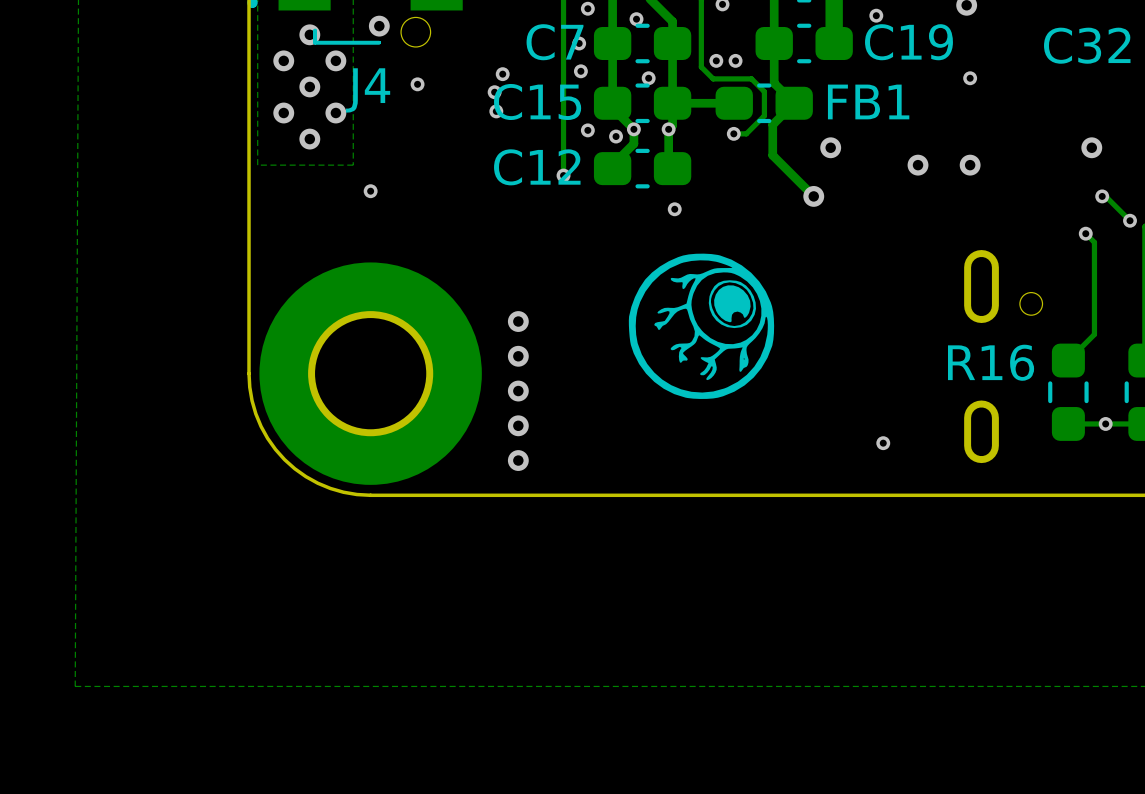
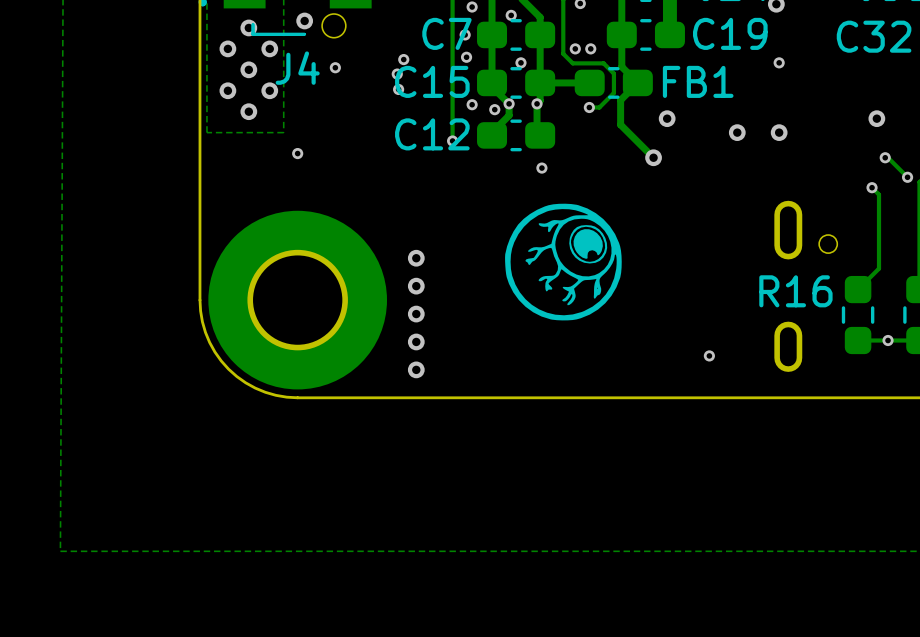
via: (876, 15) -> none

